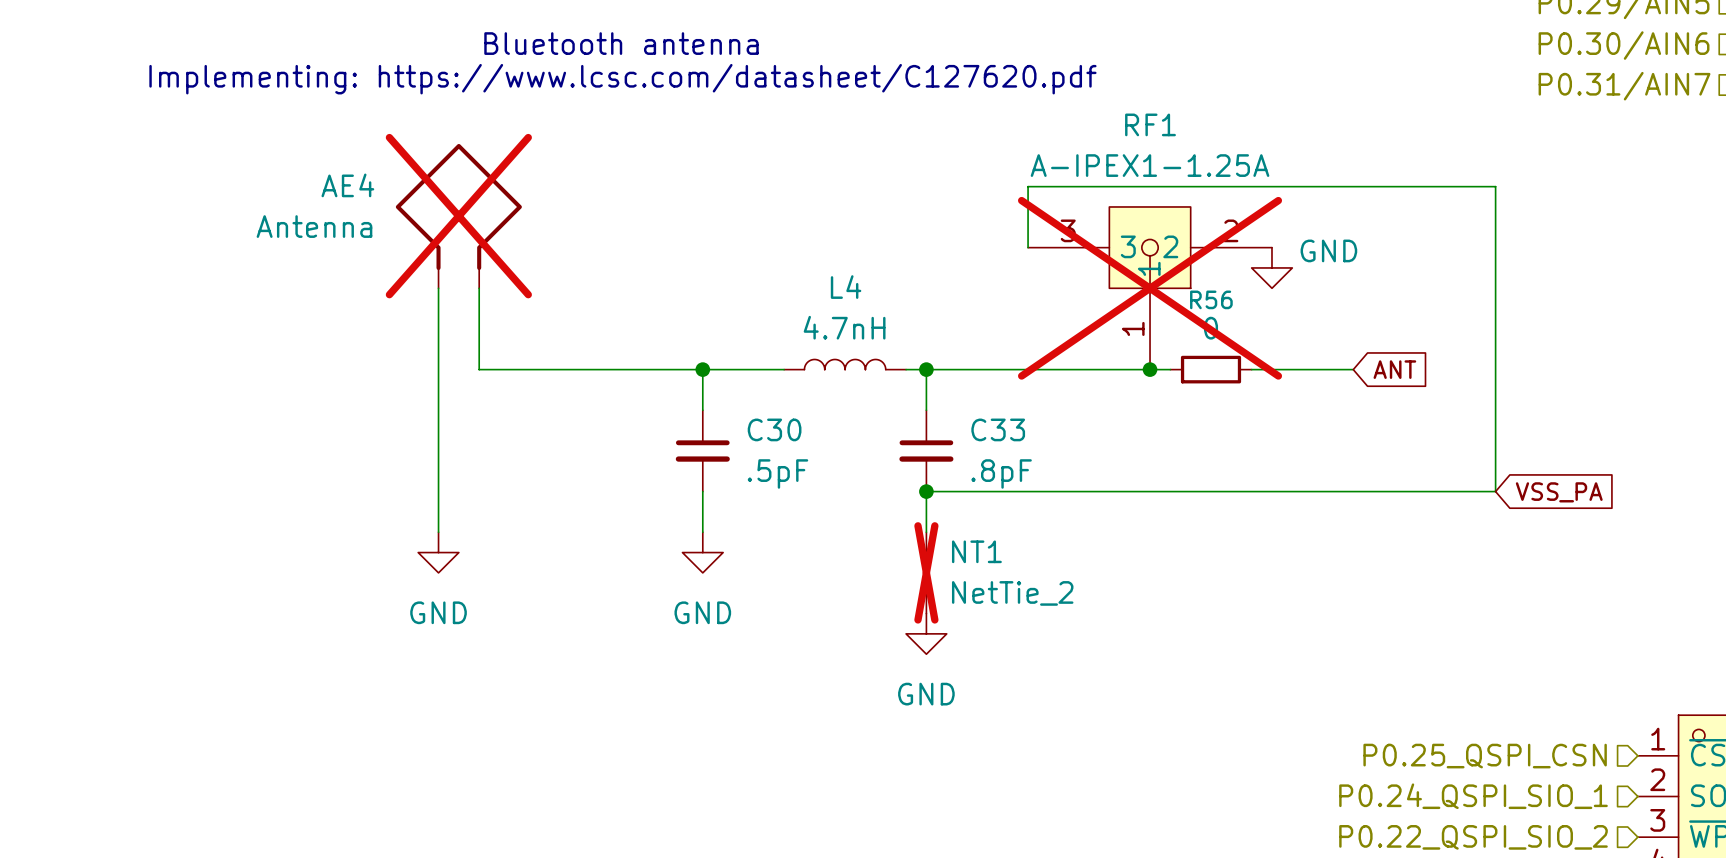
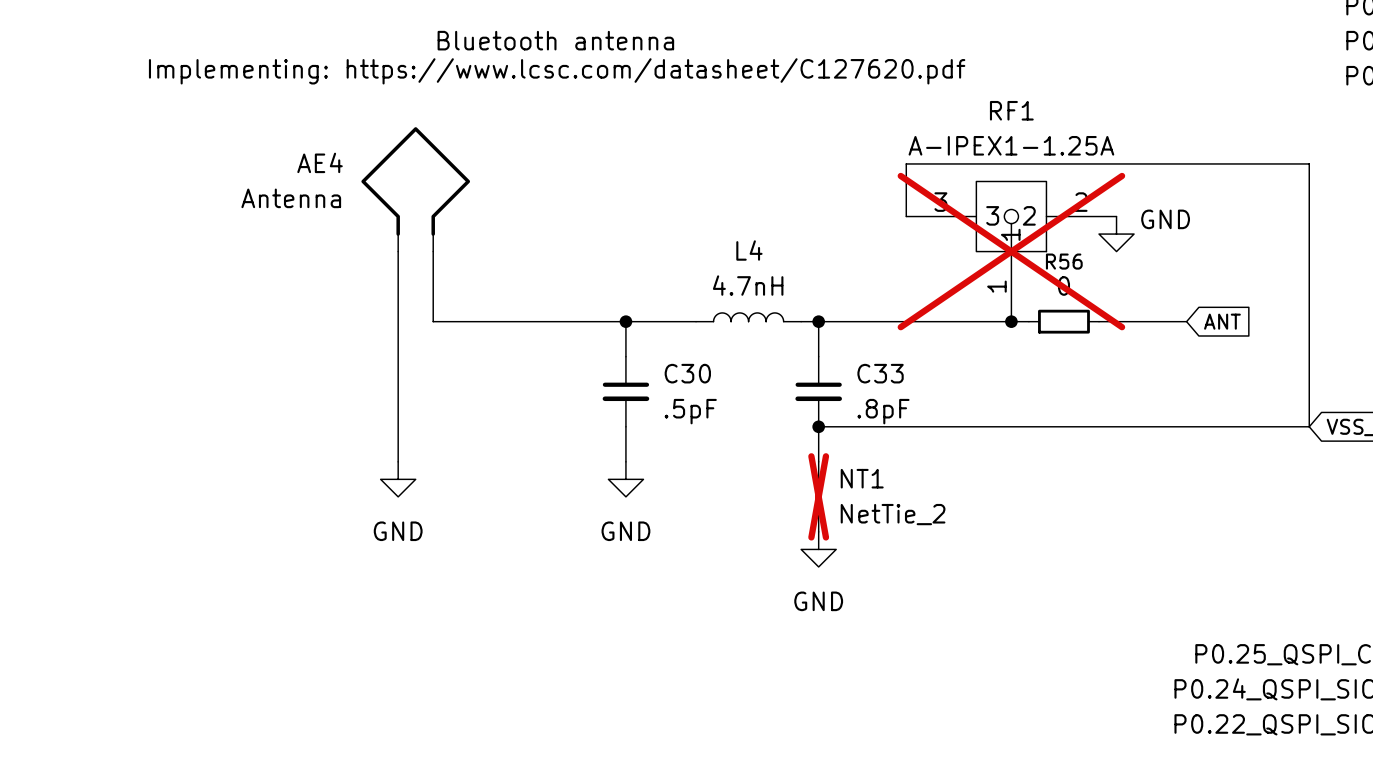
AE4 do-not-place cross: (458, 216) -> none

